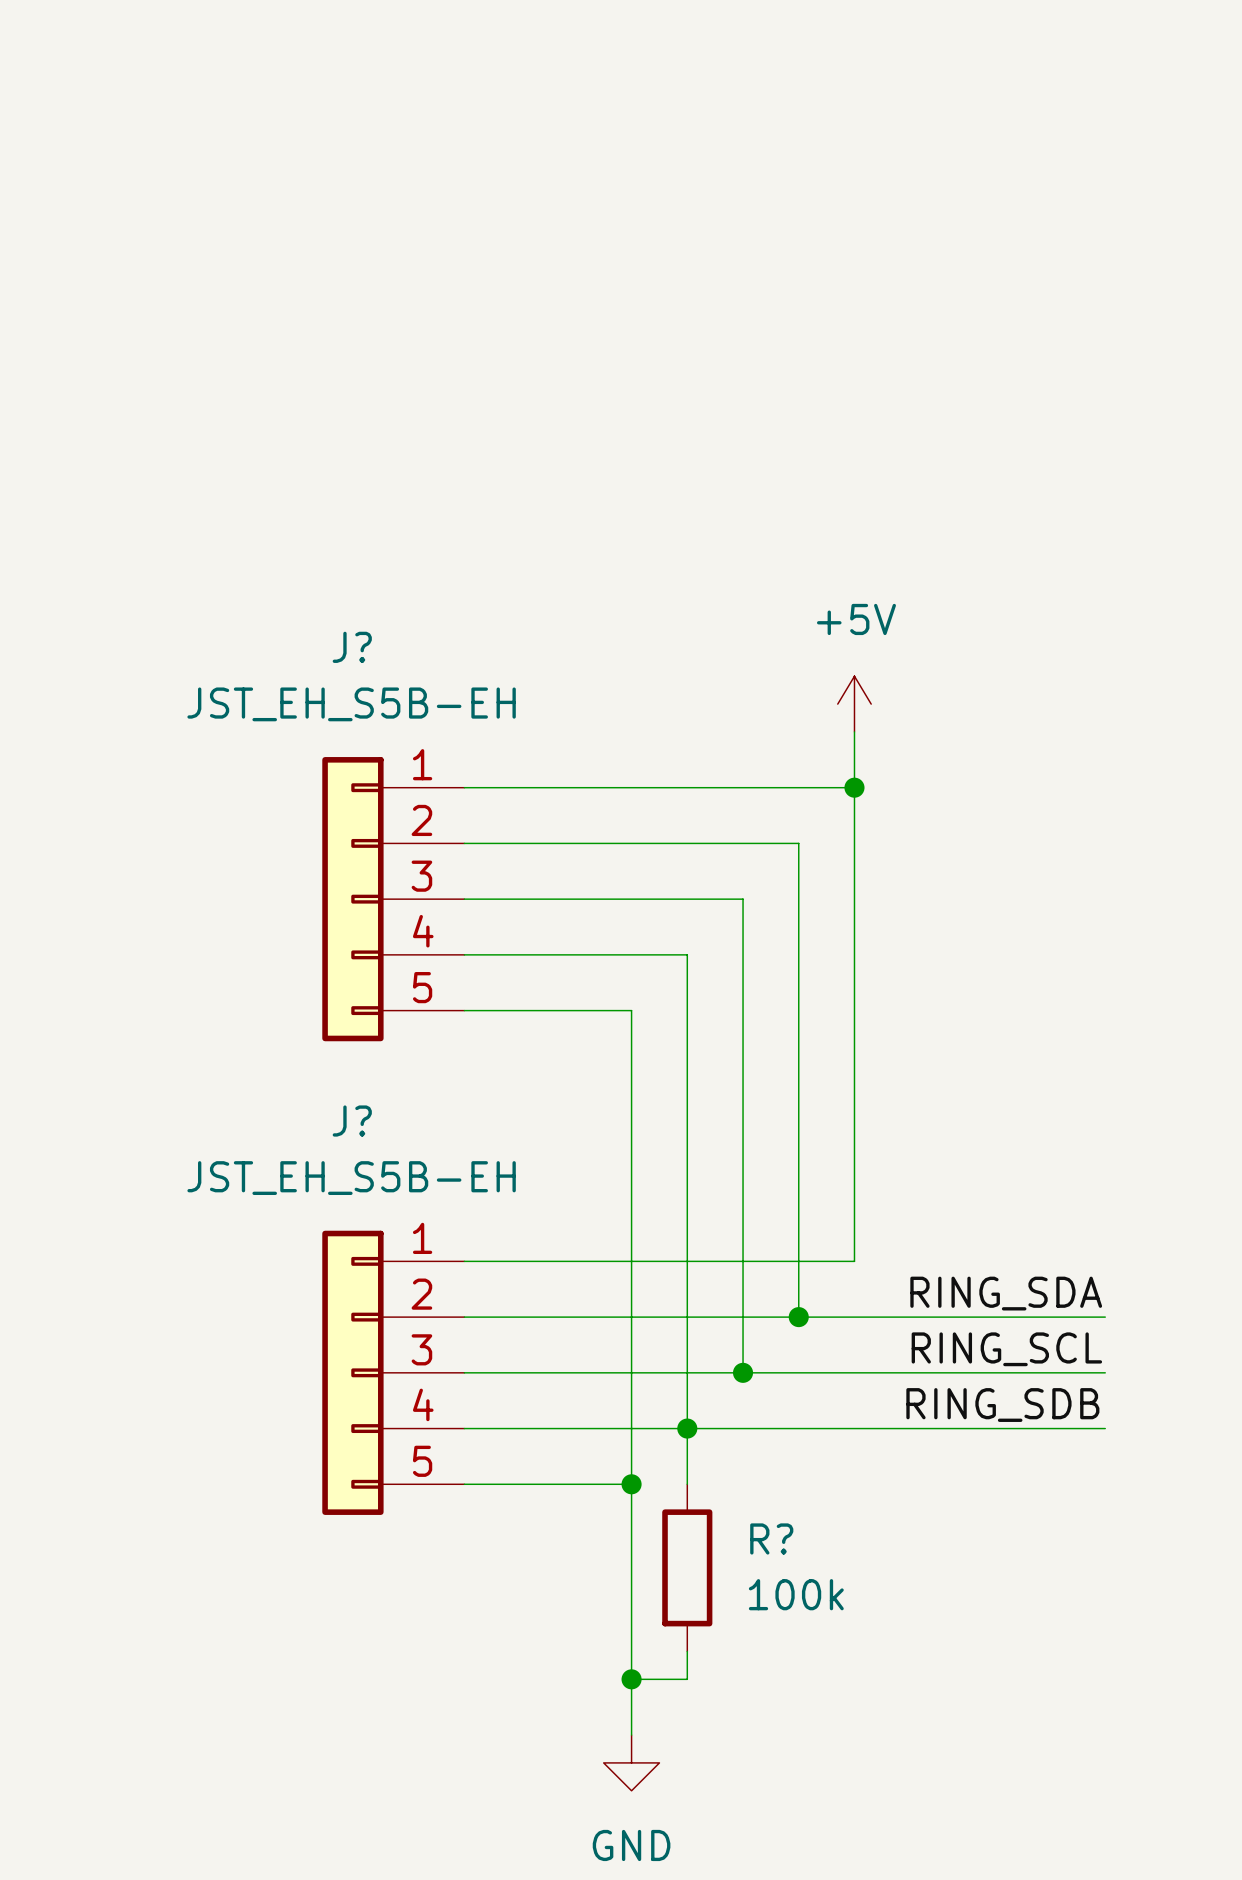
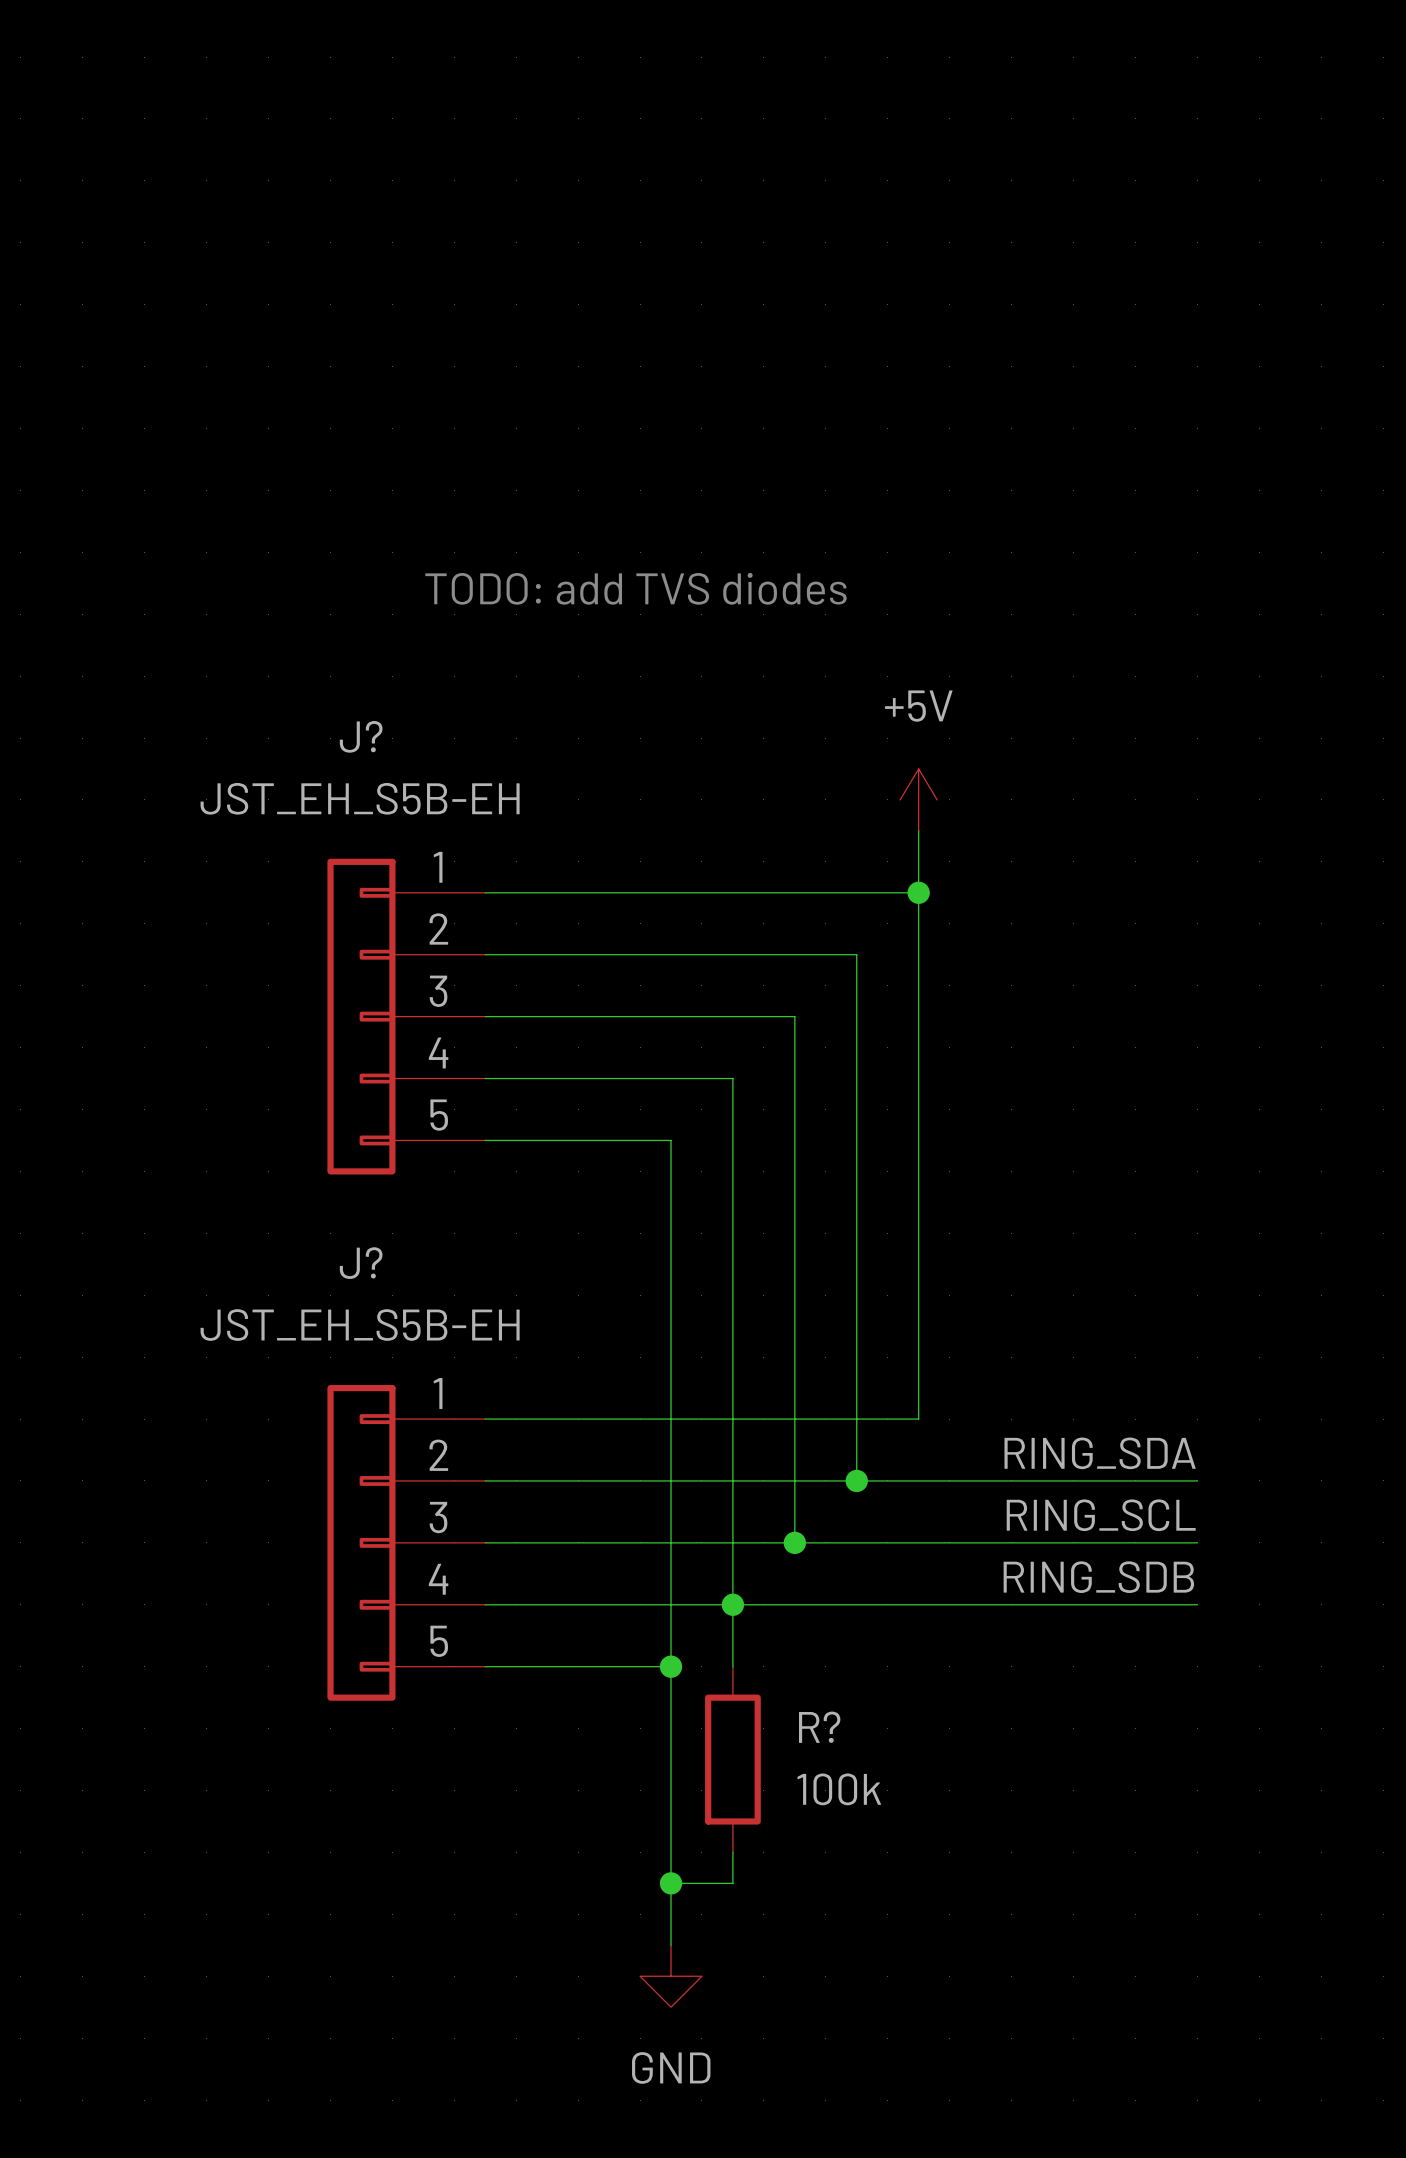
text: none -> TODO: add TVS diodes (635, 588)

